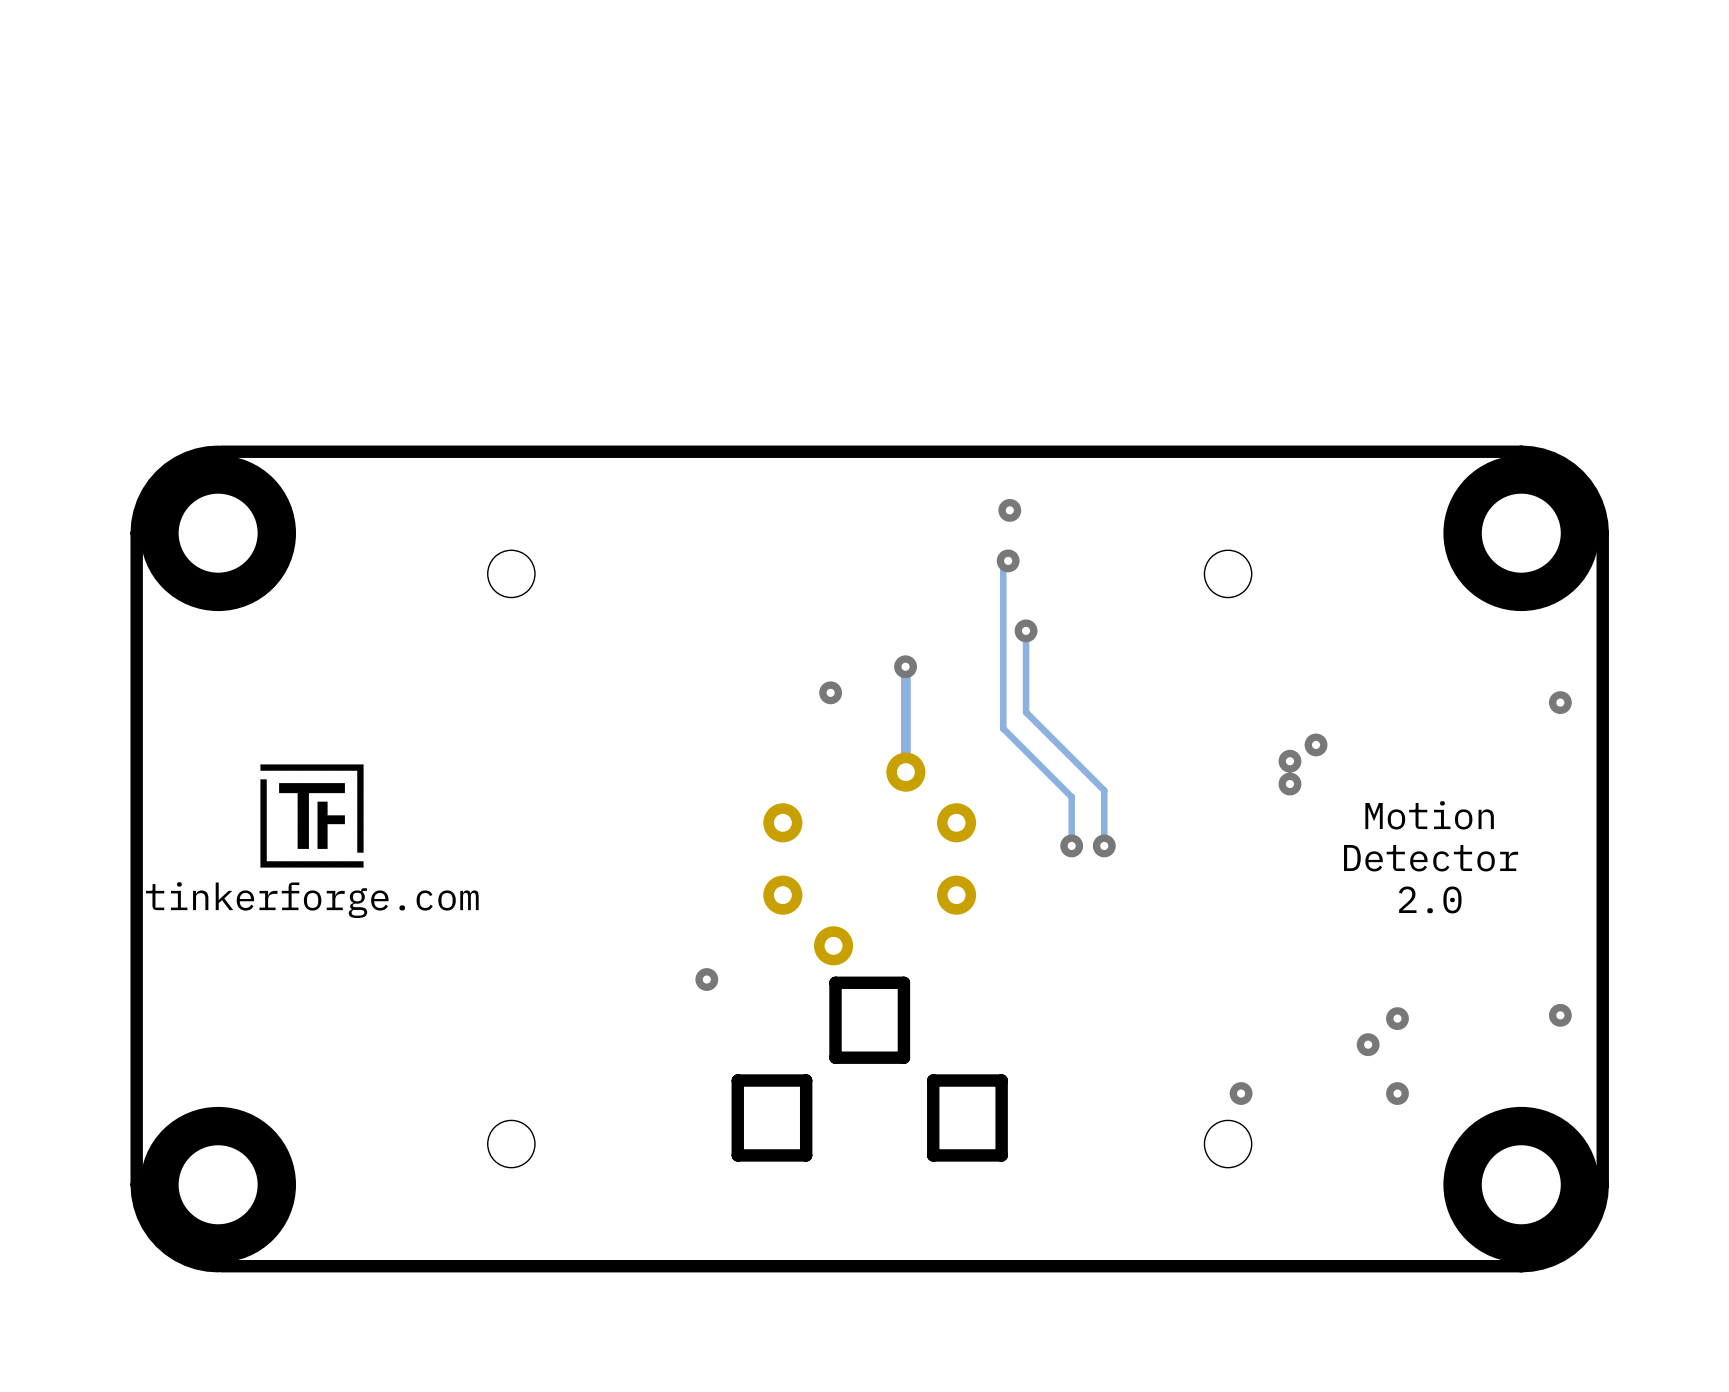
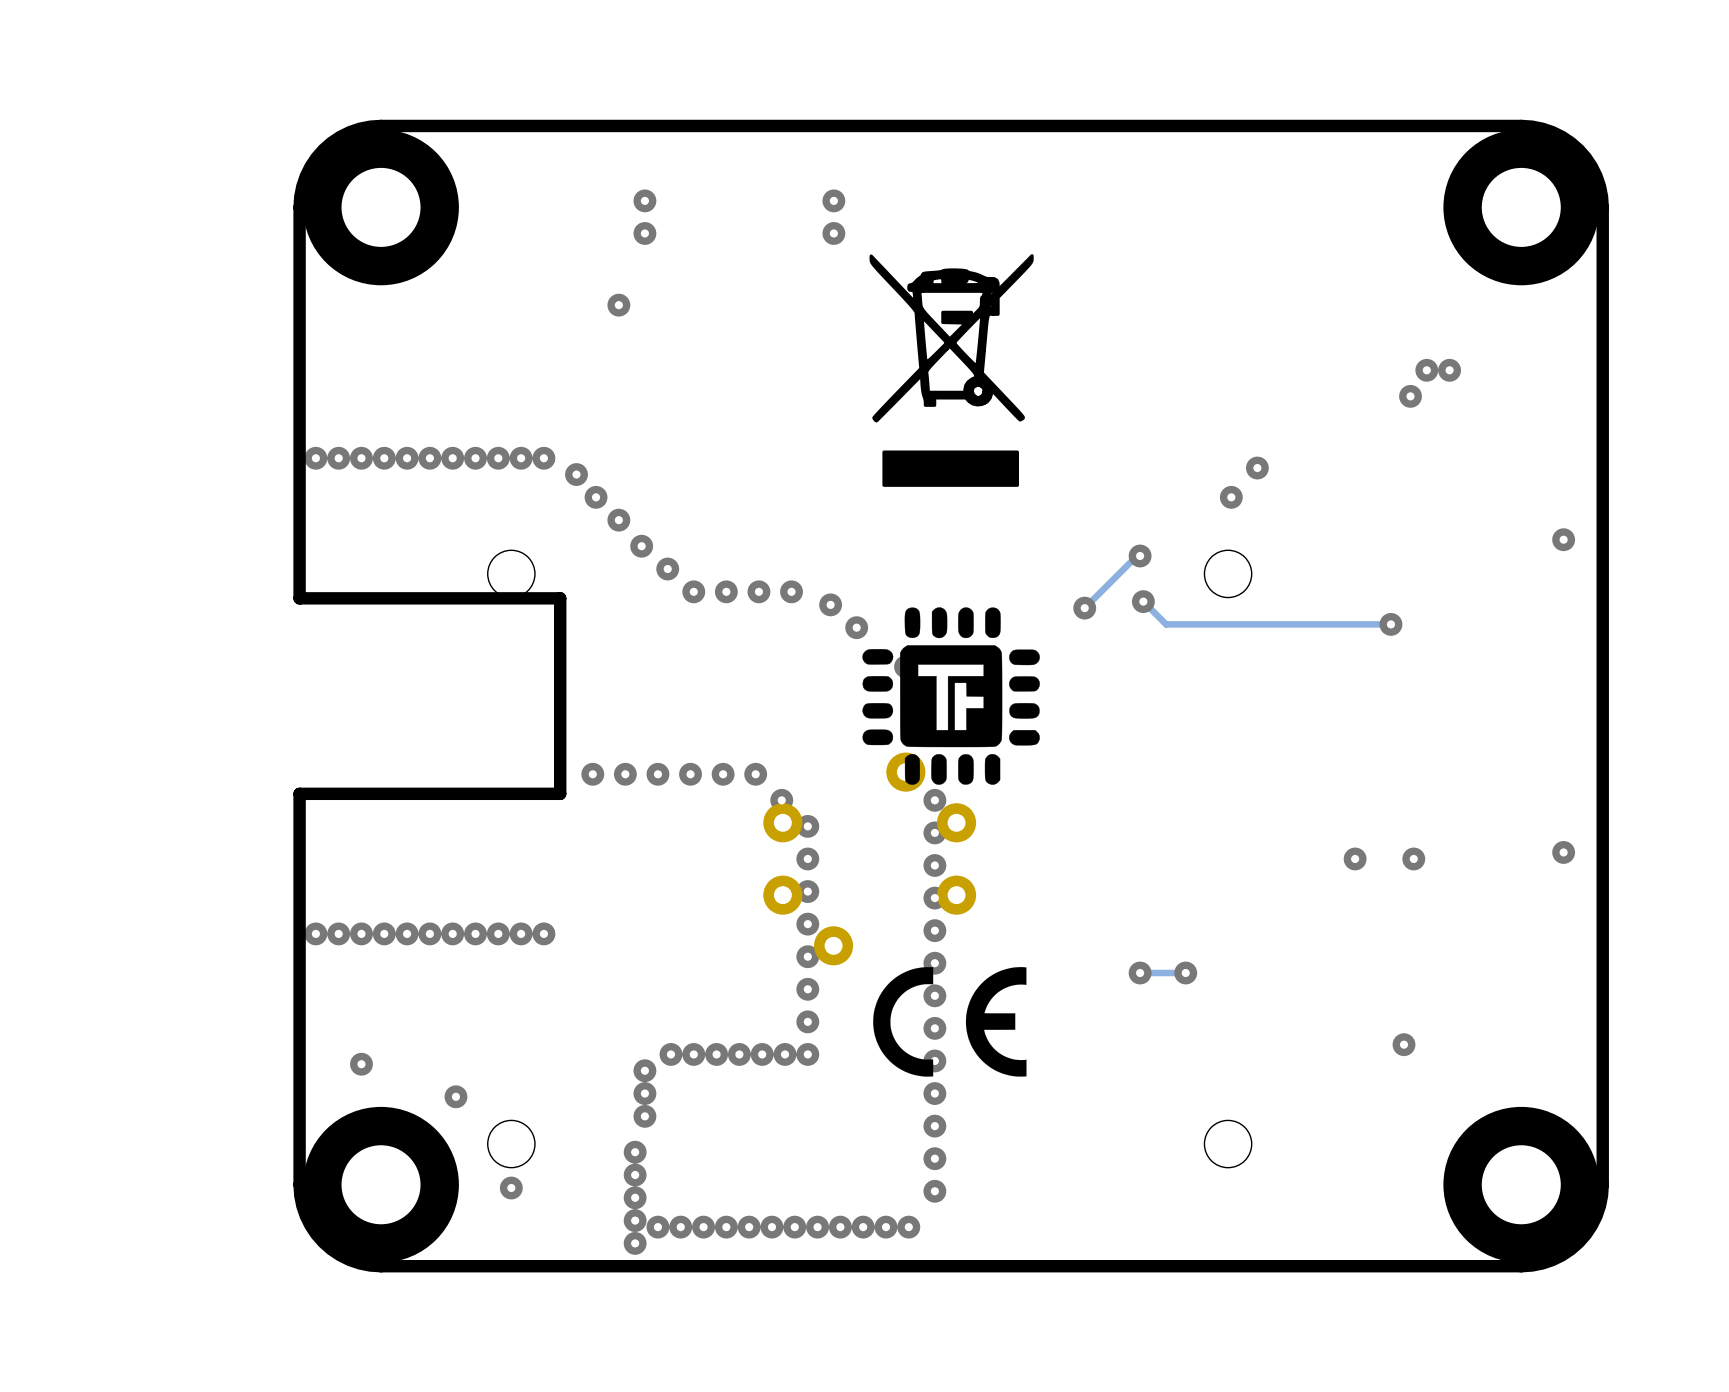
via: none -> (644, 200)
via: none -> (833, 200)
part: none -> (381, 207)
via: none -> (644, 233)
via: none -> (833, 233)
drawing: none -> [869, 254, 1034, 487]
via: none -> (618, 305)
via: none -> (1426, 370)
via: none -> (1449, 370)
via: none -> (1410, 396)
board edge: (218, 451) (186, 457) (160, 475) (142, 502) (136, 533) (137, 1195) (147, 1225) (168, 1249) (197, 1263) (218, 1266) -> none
board edge: (221, 451) (1521, 451) (1552, 457) (1578, 475) (1596, 502) (1602, 533) -> (381, 1266) (359, 1263) (331, 1249) (310, 1225) (300, 1195) (299, 793) (560, 793) (560, 598) (299, 598) (300, 196) (305, 176) (316, 157) (340, 136) (359, 128) (381, 125) (1521, 125) (1542, 128) (1562, 136) (1585, 157) (1596, 176) (1602, 196) (1602, 533)
via: none -> (315, 458)
via: none -> (338, 458)
via: none -> (361, 458)
via: none -> (384, 458)
via: none -> (407, 458)
via: none -> (429, 458)
via: none -> (452, 458)
via: none -> (475, 458)
via: none -> (498, 458)
via: none -> (521, 458)
via: none -> (543, 458)
via: none -> (1257, 468)
via: none -> (576, 474)
via: none -> (596, 497)
via: none -> (1231, 497)
via: (1009, 510) -> none
via: none -> (618, 520)
part: (218, 533) -> none
part position: (1521, 533) -> (1521, 207)
via: none -> (1563, 539)
via: none -> (641, 546)
track: none -> (1140, 555) (1136, 555) (1084, 608)
via: none -> (1140, 555)
track: (1008, 560) (1003, 565) (1003, 728) (1071, 797) (1071, 845) -> none
via: (1008, 560) -> none
via: none -> (667, 569)
via: none -> (693, 591)
via: none -> (726, 591)
via: none -> (758, 591)
via: none -> (791, 591)
track: none -> (1143, 601) (1166, 624) (1390, 624)
via: none -> (1143, 601)
via: none -> (830, 604)
drawing: none -> [862, 607, 1040, 785]
via: none -> (1084, 608)
via: none -> (1390, 624)
via: none -> (856, 627)
track: (1026, 630) (1026, 712) (1104, 790) (1104, 845) -> none
via: (1026, 630) -> none
track: (905, 667) (905, 772) -> none
via: (830, 692) -> none
via: (1560, 702) -> none
via: (1316, 744) -> none
via: (1289, 761) -> none
drawing: [260, 764, 364, 868] -> none
via: none -> (592, 774)
via: none -> (625, 774)
via: none -> (657, 774)
via: none -> (690, 774)
via: none -> (723, 774)
via: none -> (755, 774)
via: (1289, 784) -> none
via: none -> (781, 800)
via: none -> (934, 800)
text: Motion (1429, 815) -> none
via: none -> (807, 826)
via: none -> (934, 832)
via: (1071, 845) -> none
via: (1104, 845) -> none
via: none -> (1563, 852)
via: none -> (807, 858)
via: none -> (1355, 858)
via: none -> (1413, 858)
text: Detector (1431, 858) -> none
via: none -> (934, 865)
via: none -> (807, 891)
via: none -> (934, 898)
text: 2.0 (1430, 899) -> none
text: tinkerforge.com (312, 900) -> none
via: none -> (807, 924)
via: none -> (934, 930)
via: none -> (315, 933)
via: none -> (338, 933)
via: none -> (361, 933)
via: none -> (384, 933)
via: none -> (407, 933)
via: none -> (429, 933)
via: none -> (452, 933)
via: none -> (475, 933)
via: none -> (498, 933)
via: none -> (521, 933)
via: none -> (543, 933)
via: none -> (807, 956)
via: none -> (934, 963)
drawing: none -> [873, 967, 1027, 1077]
via: none -> (1140, 973)
track: none -> (1185, 973) (1140, 973)
via: none -> (1185, 973)
via: (706, 979) -> none
board edge: (903, 982) (903, 1057) (835, 1057) (835, 982) (903, 982) -> none
via: none -> (807, 989)
via: none -> (934, 995)
via: (1560, 1015) -> none
via: (1397, 1018) -> none
via: none -> (807, 1021)
via: none -> (934, 1028)
via: (1368, 1044) -> none
via: none -> (1404, 1044)
via: none -> (670, 1054)
via: none -> (693, 1054)
via: none -> (716, 1054)
via: none -> (739, 1054)
via: none -> (762, 1054)
via: none -> (785, 1054)
via: none -> (807, 1054)
via: none -> (934, 1060)
via: none -> (361, 1064)
via: none -> (644, 1070)
board edge: (806, 1080) (737, 1080) (737, 1155) (806, 1155) (806, 1080) -> none
board edge: (1001, 1080) (933, 1080) (933, 1155) (1001, 1155) (1001, 1080) -> none
via: none -> (644, 1093)
via: none -> (934, 1093)
via: (1241, 1093) -> none
via: (1397, 1093) -> none
via: none -> (455, 1096)
via: none -> (644, 1116)
via: none -> (934, 1126)
via: none -> (635, 1152)
via: none -> (934, 1158)
via: none -> (635, 1174)
part position: (218, 1184) -> (381, 1184)
via: none -> (511, 1188)
via: none -> (934, 1191)
via: none -> (635, 1197)
via: none -> (635, 1220)
via: none -> (657, 1227)
via: none -> (680, 1227)
via: none -> (703, 1227)
via: none -> (726, 1227)
via: none -> (749, 1227)
via: none -> (771, 1227)
via: none -> (794, 1227)
via: none -> (817, 1227)
via: none -> (840, 1227)
via: none -> (863, 1227)
via: none -> (886, 1227)
via: none -> (908, 1227)
via: none -> (635, 1243)
board edge: (381, 1266) (221, 1266) -> none

